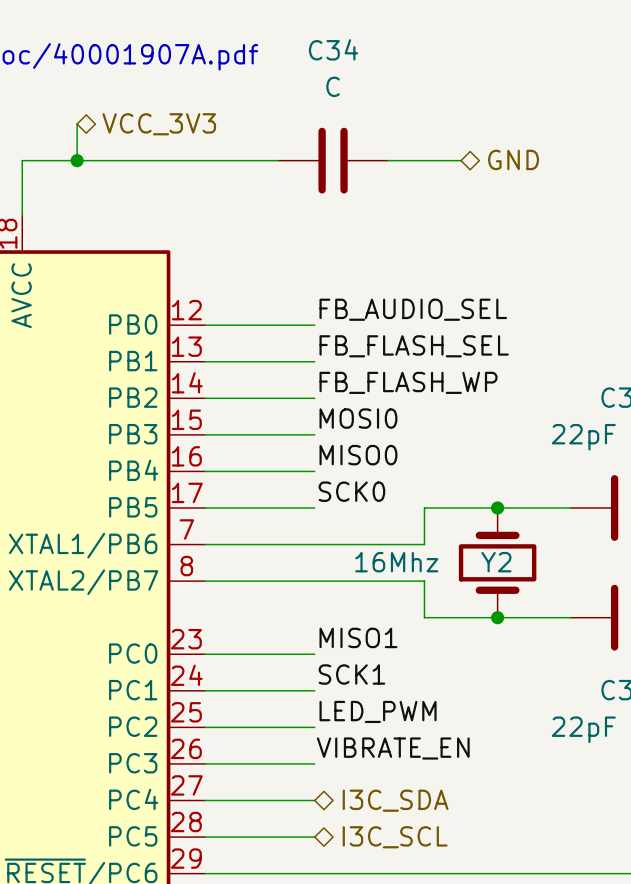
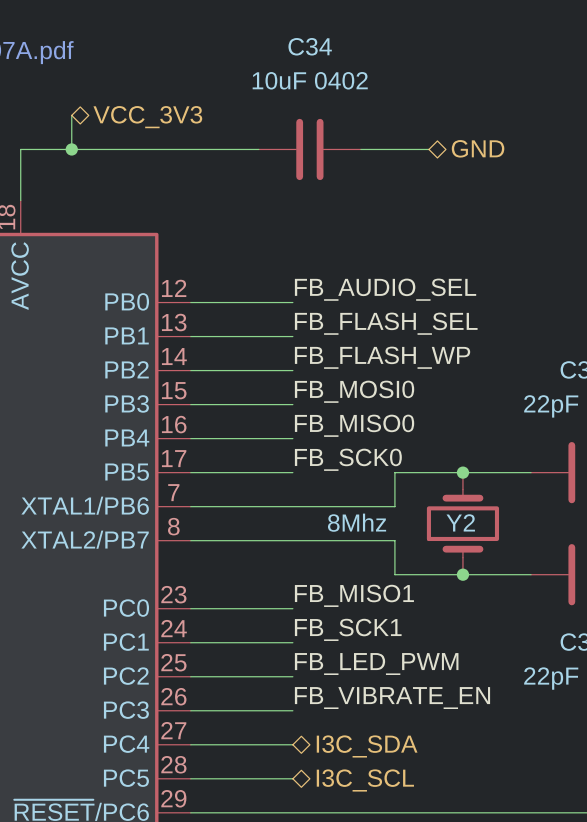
C34 value: C (333, 86) -> 10uF 0402 (310, 80)
label: MOSI0 (358, 418) -> FB_MOSI0 (354, 391)
label: MISO0 (358, 455) -> FB_MISO0 (354, 425)
label: SCK0 (351, 491) -> FB_SCK0 (348, 459)
Y2 value: 16Mhz (396, 562) -> 8Mhz (357, 522)
label: MISO1 (358, 637) -> FB_MISO1 (354, 595)
label: SCK1 (351, 674) -> FB_SCK1 (348, 629)
label: LED_PWM (378, 711) -> FB_LED_PWM (376, 664)
label: VIBRATE_EN (393, 748) -> FB_VIBRATE_EN (392, 698)

